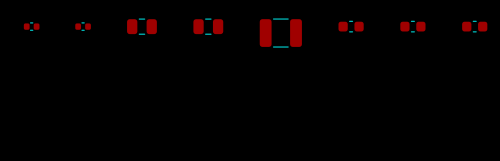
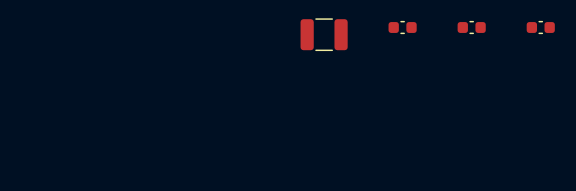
part: (31, 26) -> none
part: (83, 26) -> none
part: (141, 26) -> none
part: (208, 26) -> none

